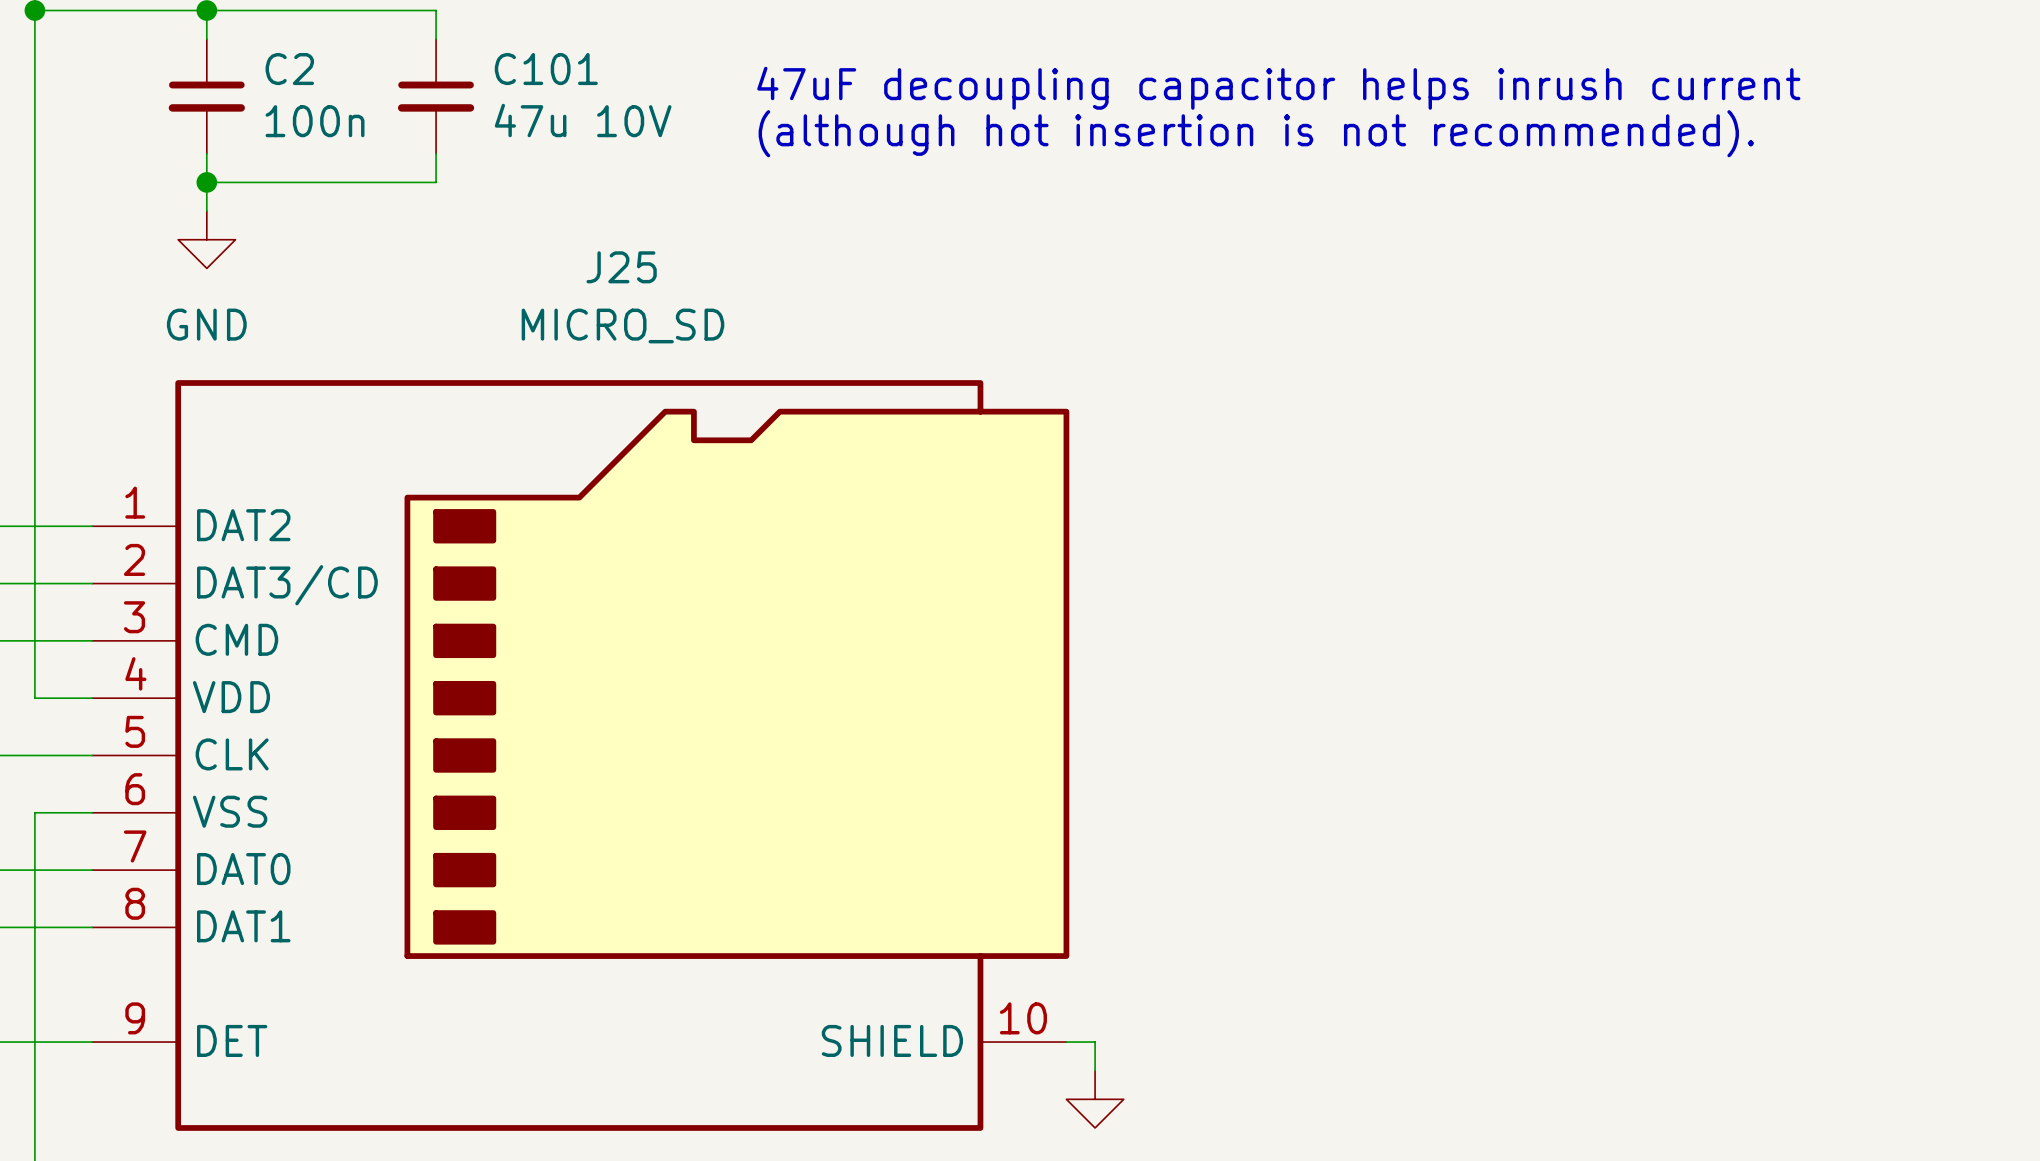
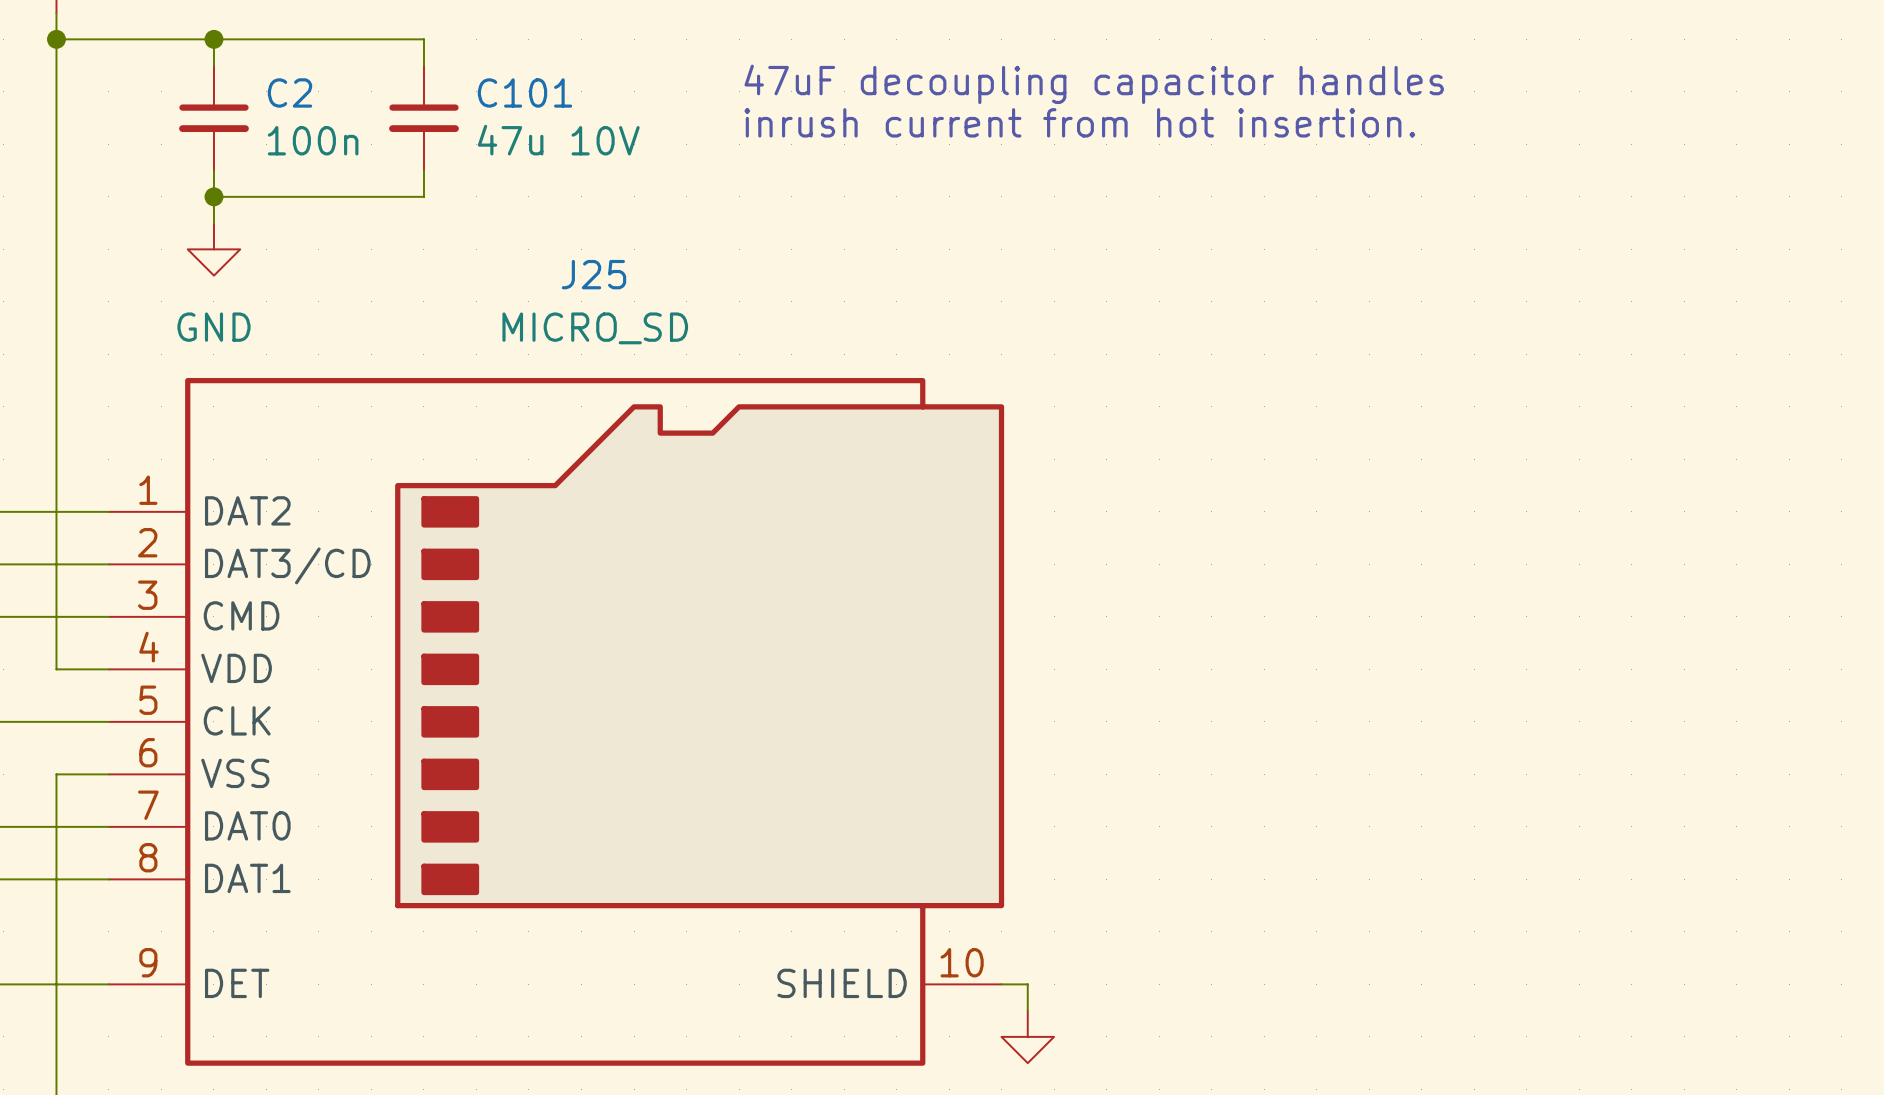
text: 47uF decoupling capacitor helps inrush current (1278, 88) -> 47uF decoupling capacitor handles (1094, 84)
text: none -> inrush current from hot insertion. (1079, 122)
text: (although hot insertion is not recommended). (1256, 133) -> none

